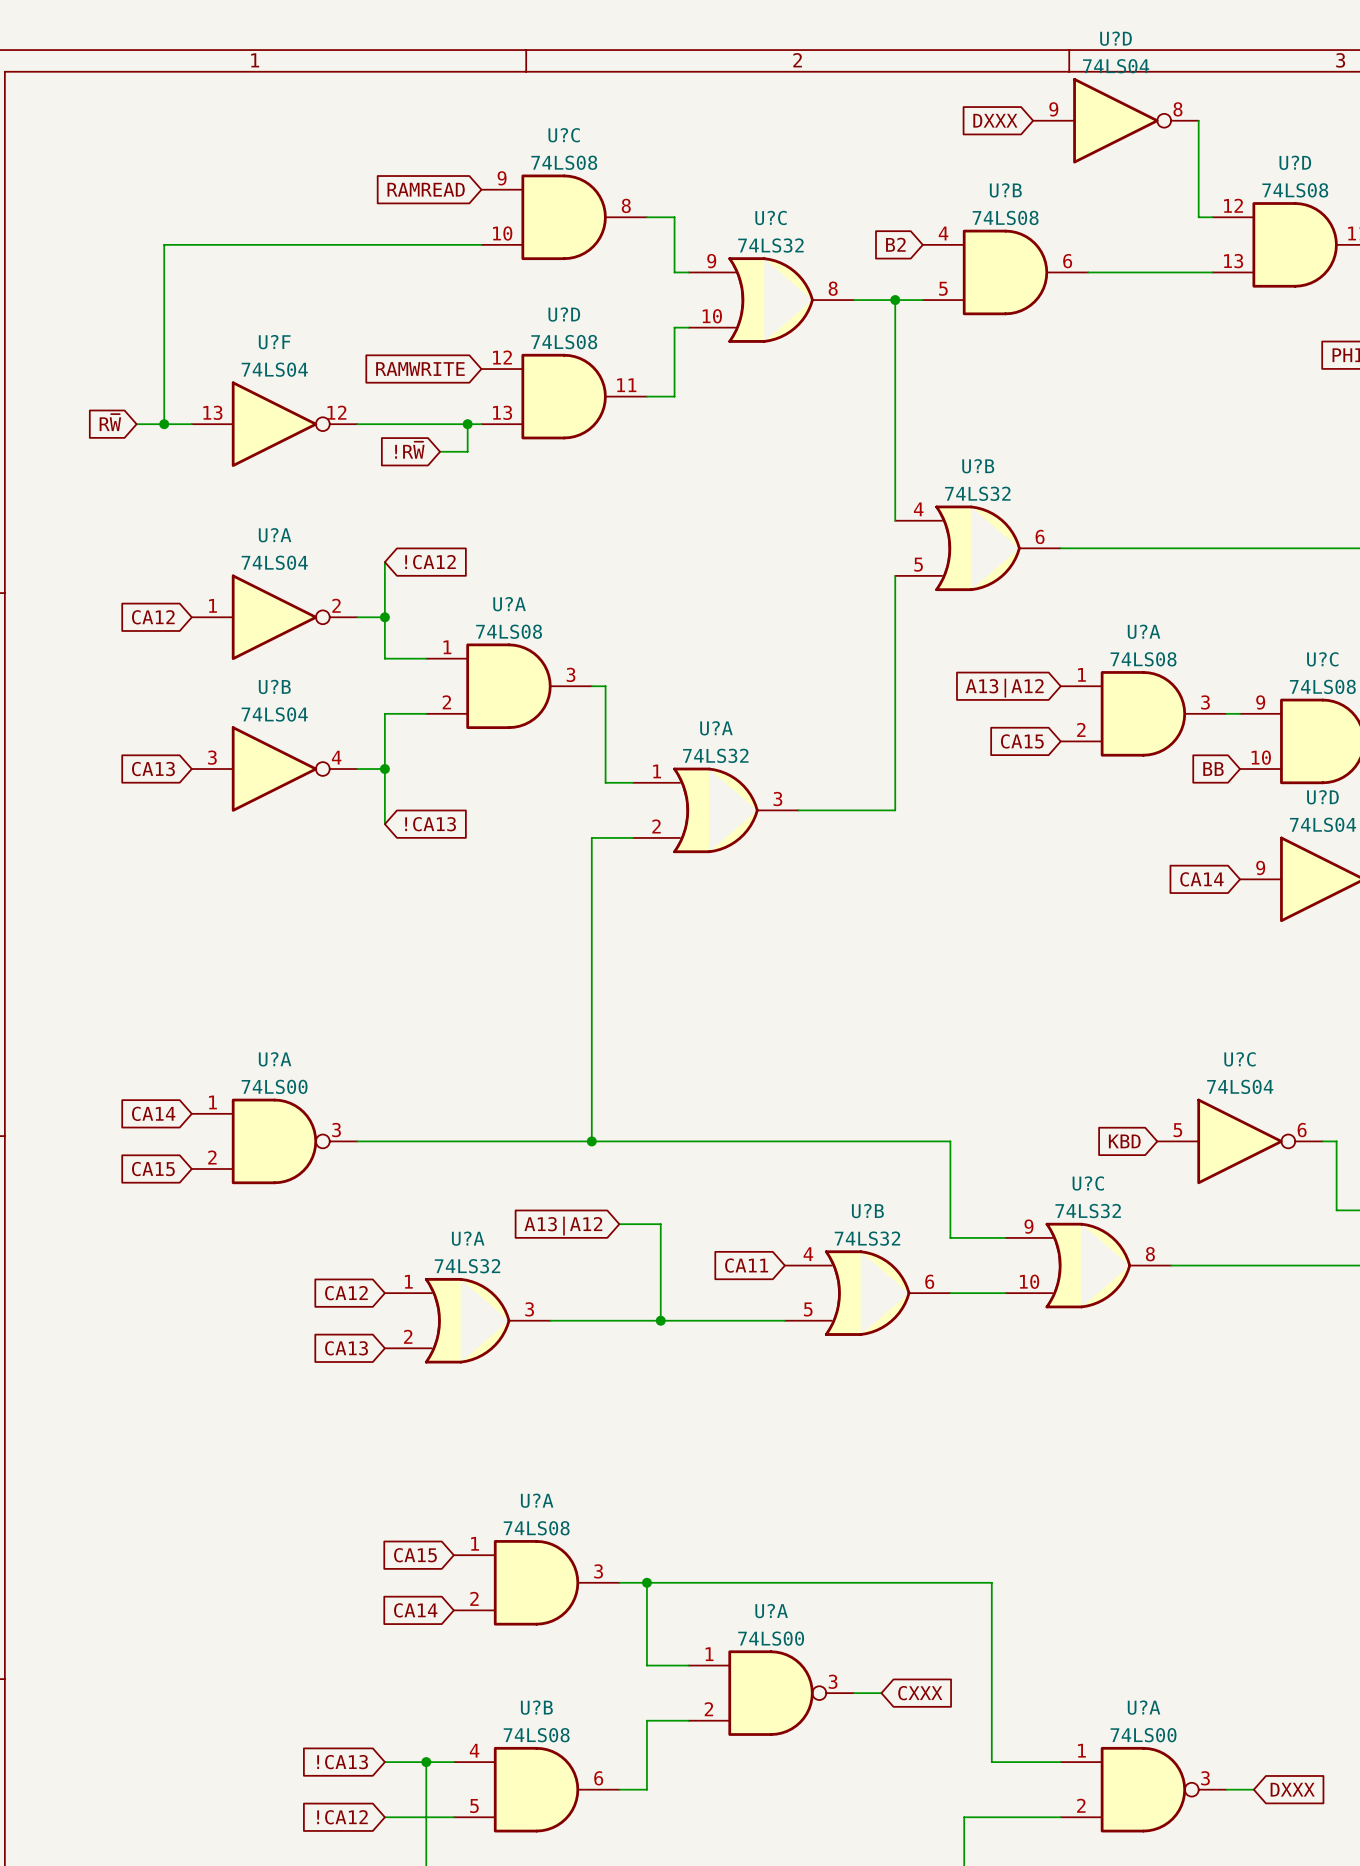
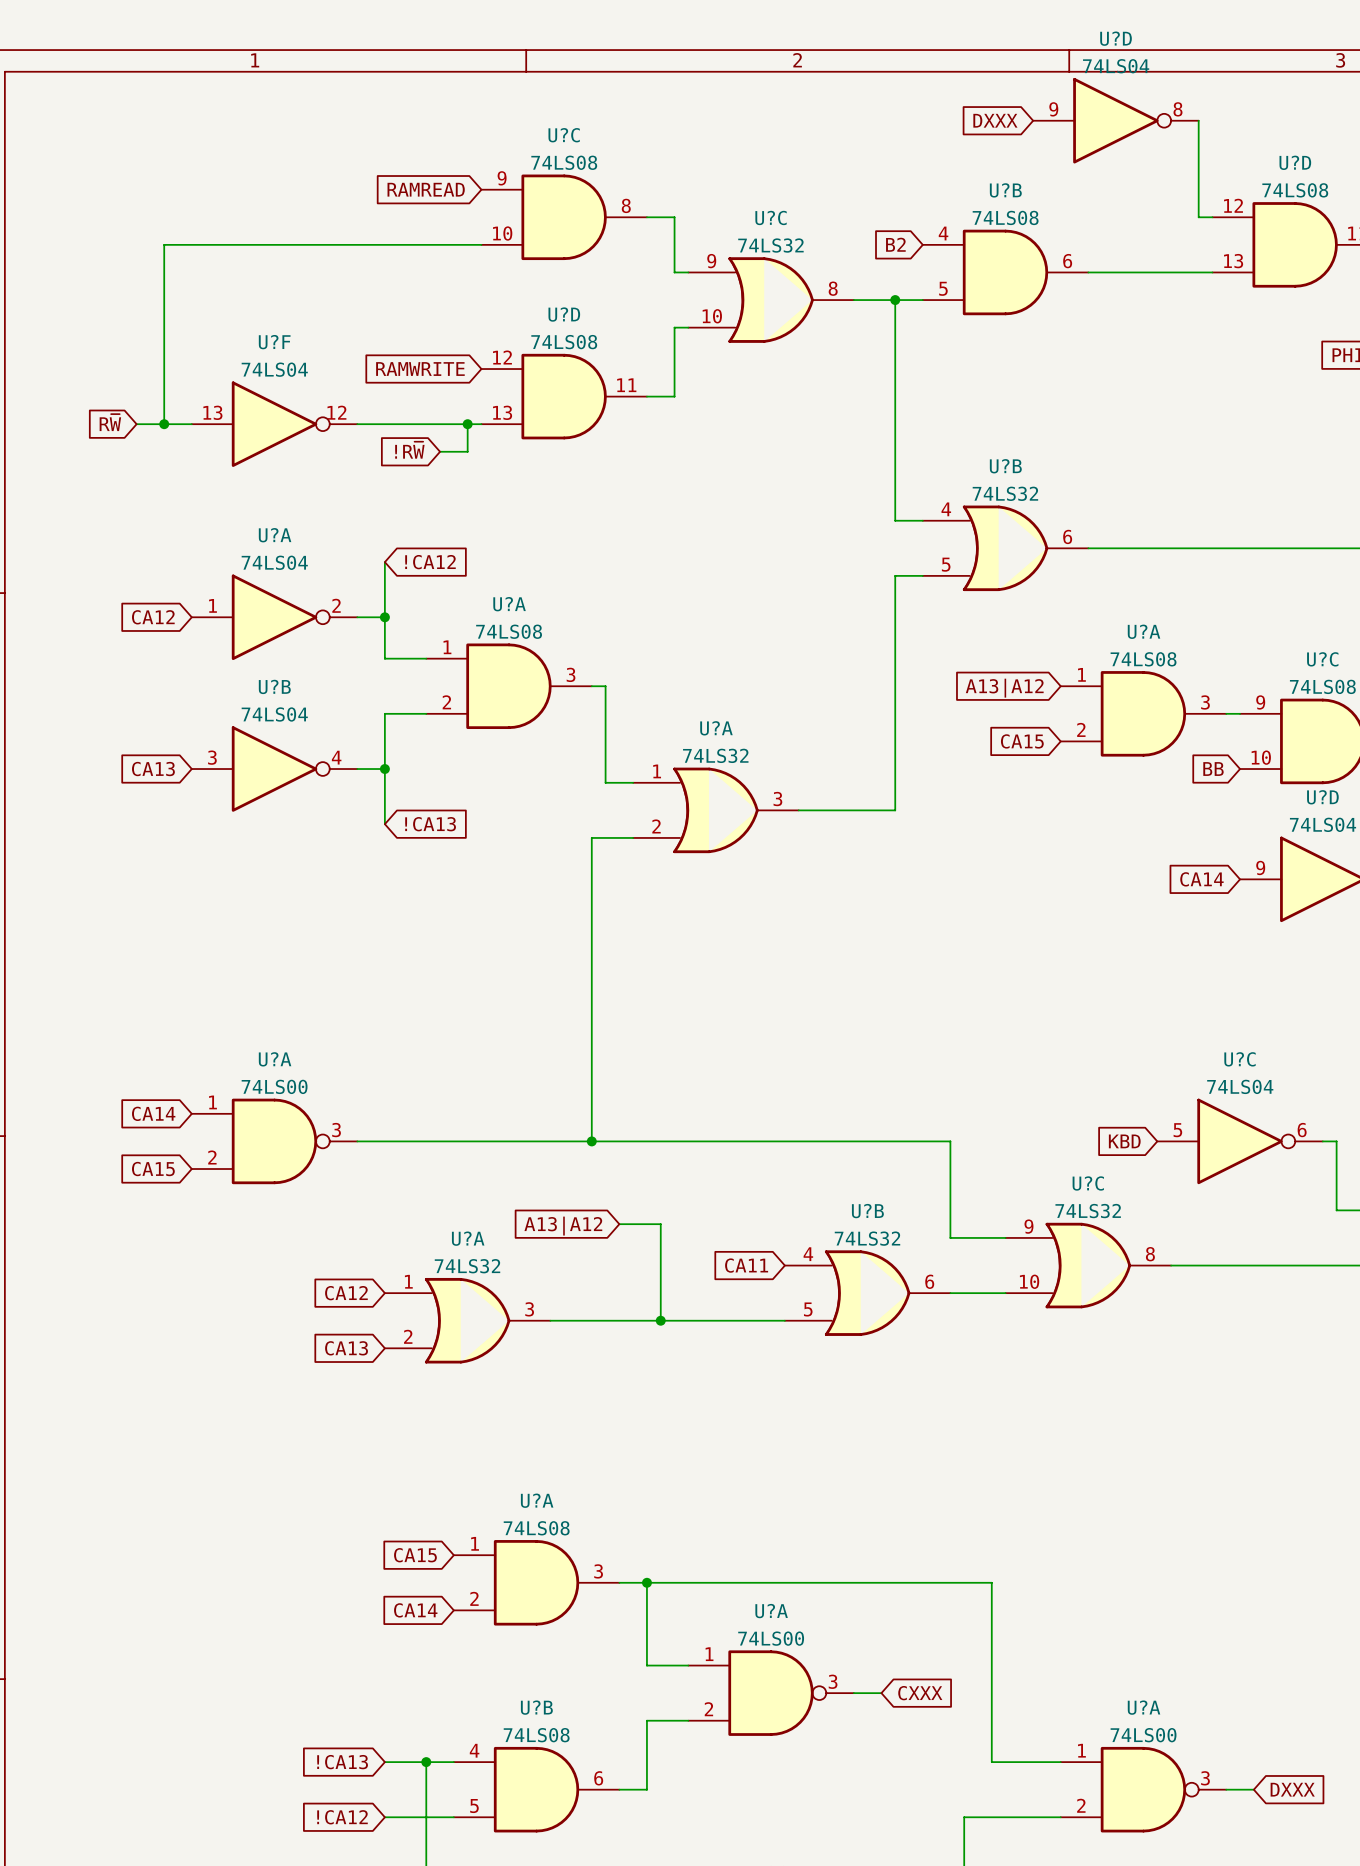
U?B position: (977, 548) -> (1005, 548)

